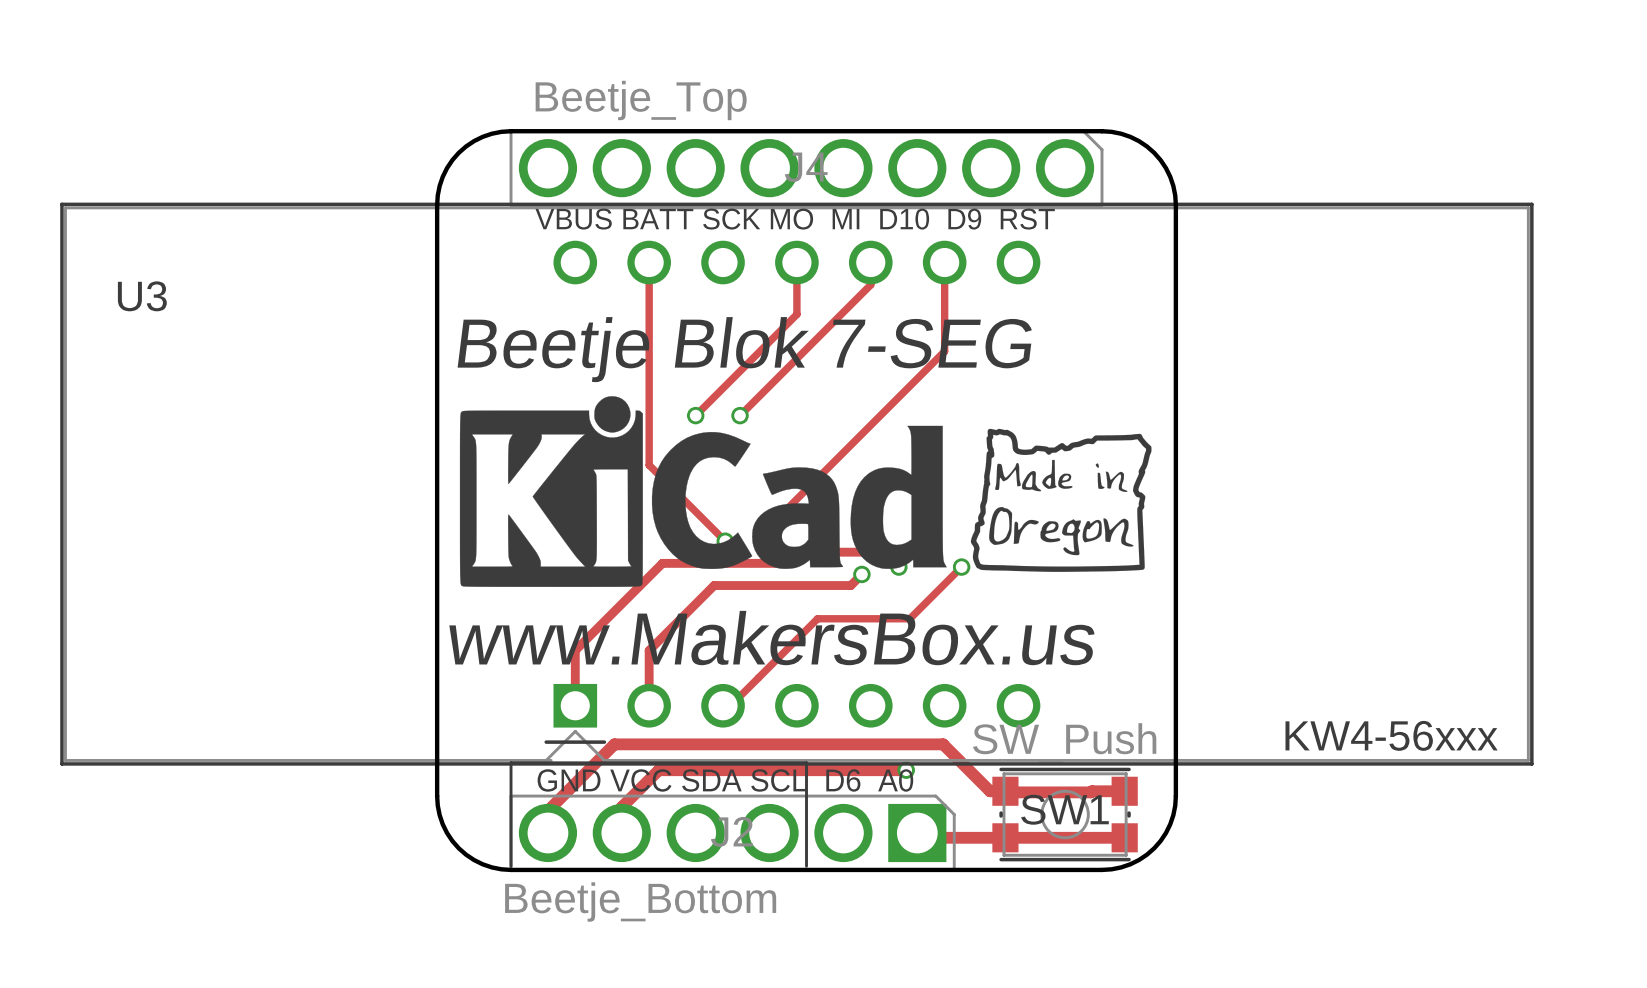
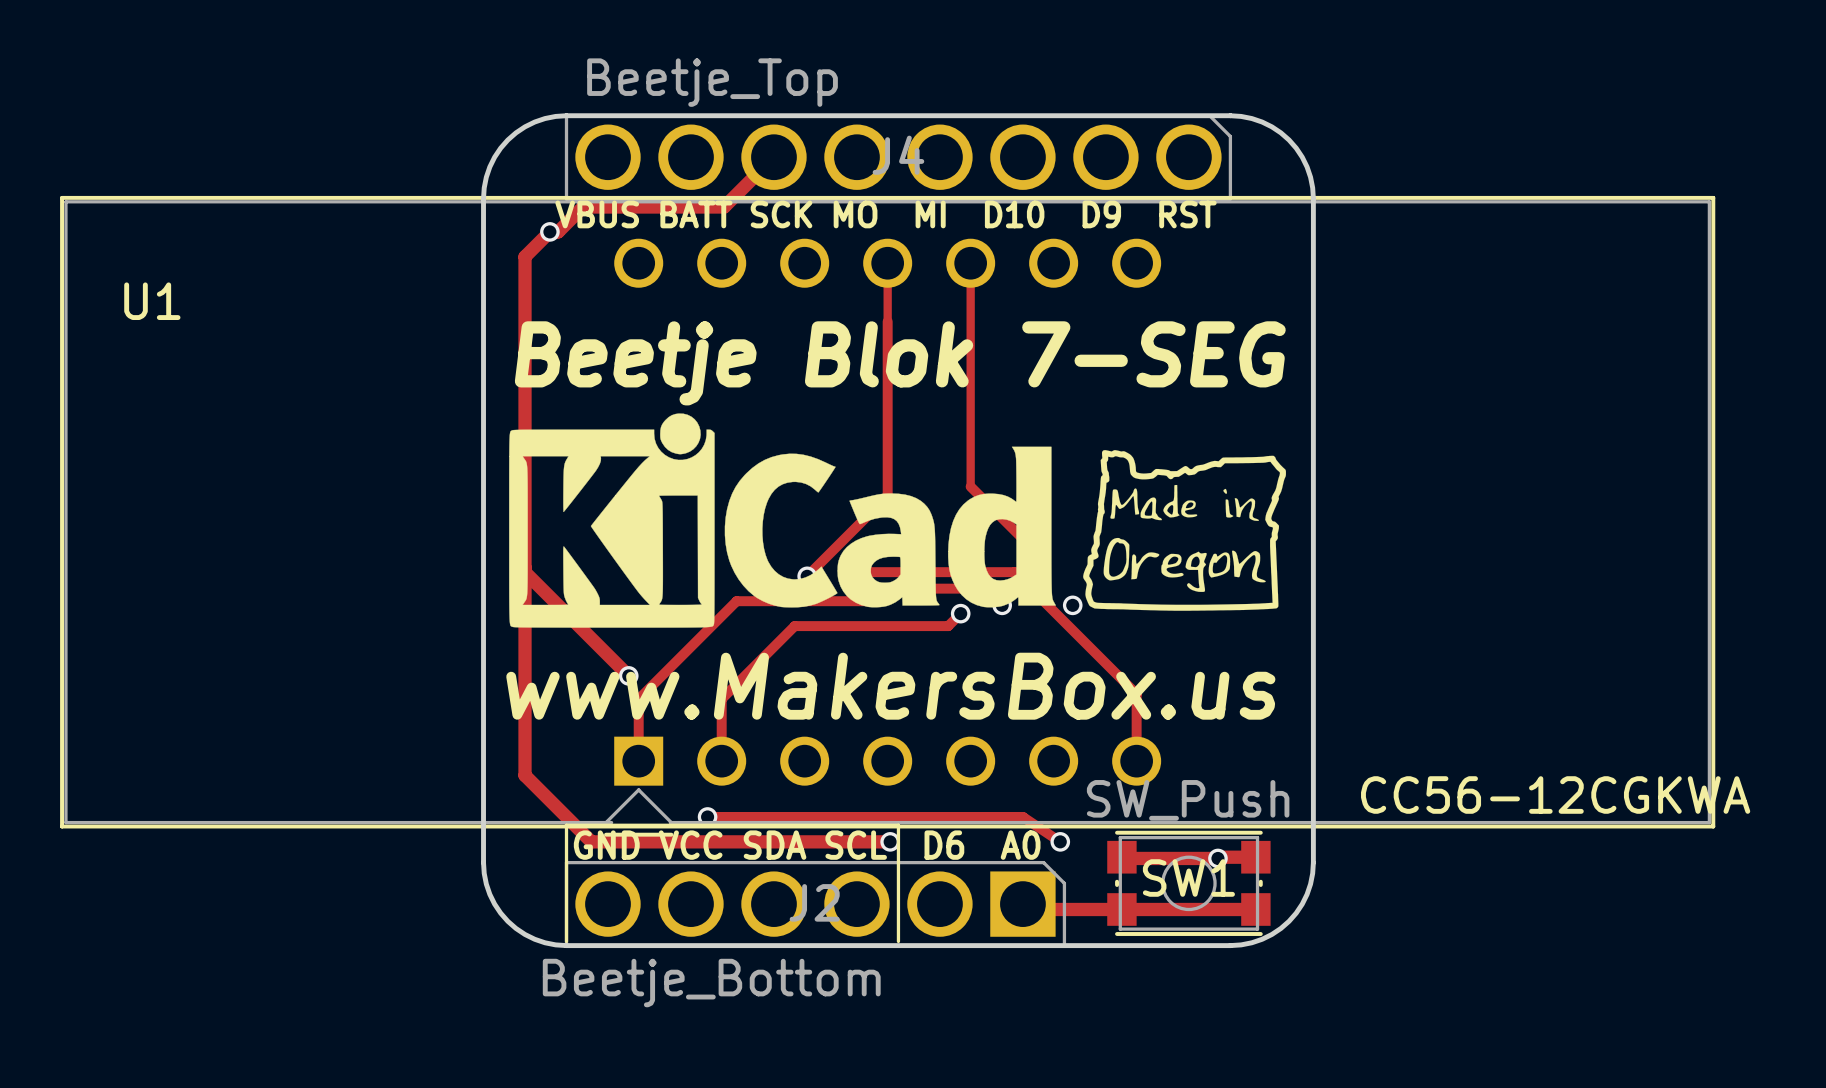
track: none -> (773, 157) (724, 207) (583, 207) (558, 231) (549, 231) (525, 256) (525, 775) (591, 841) (890, 841)
via: none -> (549, 231)
track: (649, 262) (649, 465) (725, 541) -> none
track: (944, 262) (944, 351) (769, 526) (769, 537) -> (1136, 761) (1136, 694) (1014, 572) (856, 572)
track: (870, 284) (740, 415) -> (970, 288) (970, 486) (1043, 559) (1043, 568)
track: (796, 314) (695, 415) -> (887, 321) (887, 495) (807, 576)
via: (695, 415) -> none
via: (740, 415) -> none
U3: KW4-56xxx (796, 484) -> none
U1: none -> CC56-12CGKWA (887, 516)
track: none -> (525, 572) (628, 675)
track: (961, 567) (909, 618) (817, 618) (730, 705) (723, 705) -> none
via: none -> (628, 675)
track: none -> (707, 816) (1022, 816) (1060, 841)
via: none -> (707, 816)
track: (906, 770) (658, 770) (621, 807) (621, 833) -> none
via position: (906, 770) -> (1060, 841)
via: none -> (890, 841)
track: (1005, 791) (990, 791) (943, 744) (614, 744) (547, 810) (547, 833) -> none
via: none -> (1217, 858)

